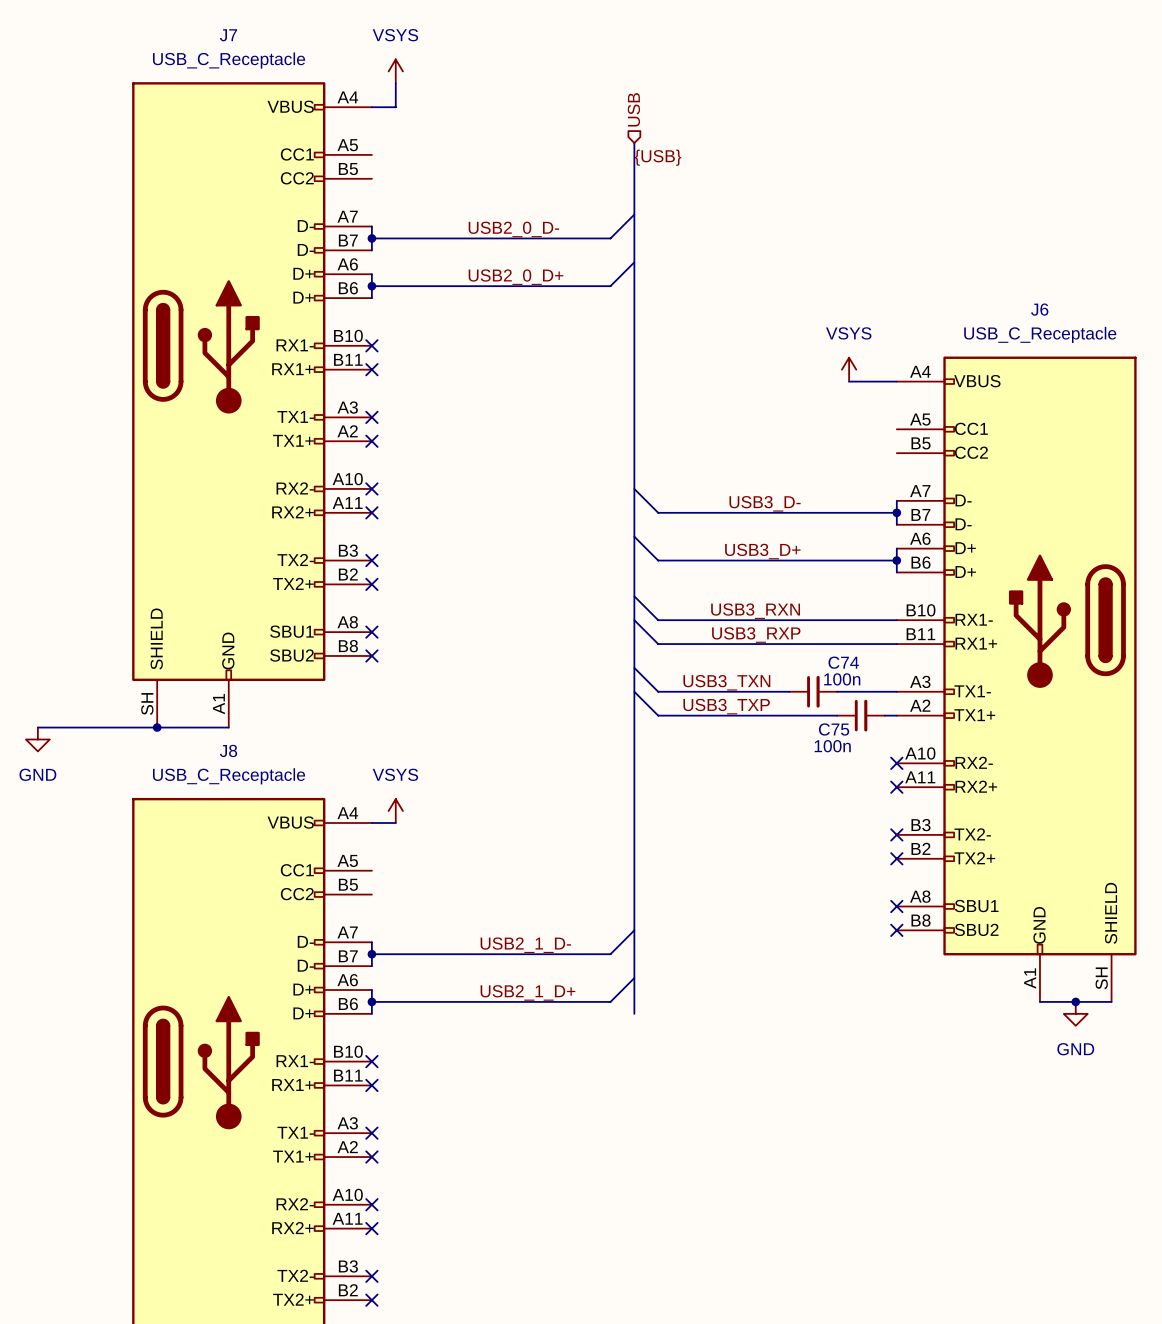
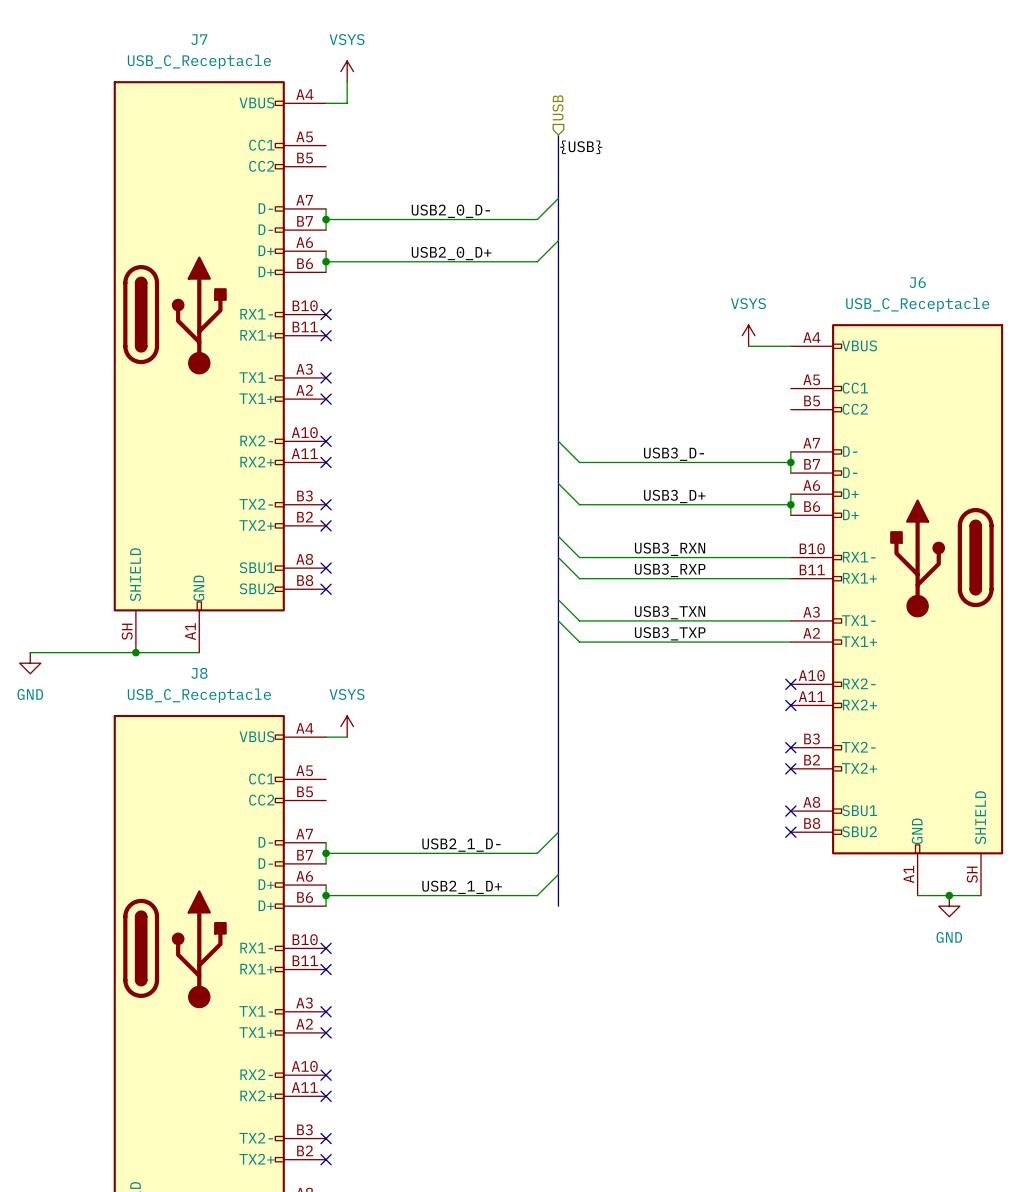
label position: USB3_TXN (726, 682) -> USB3_TXN (670, 612)
C74: 100n (813, 691) -> none
label position: USB3_TXP (726, 706) -> USB3_TXP (670, 633)
C75: 100n (861, 715) -> none

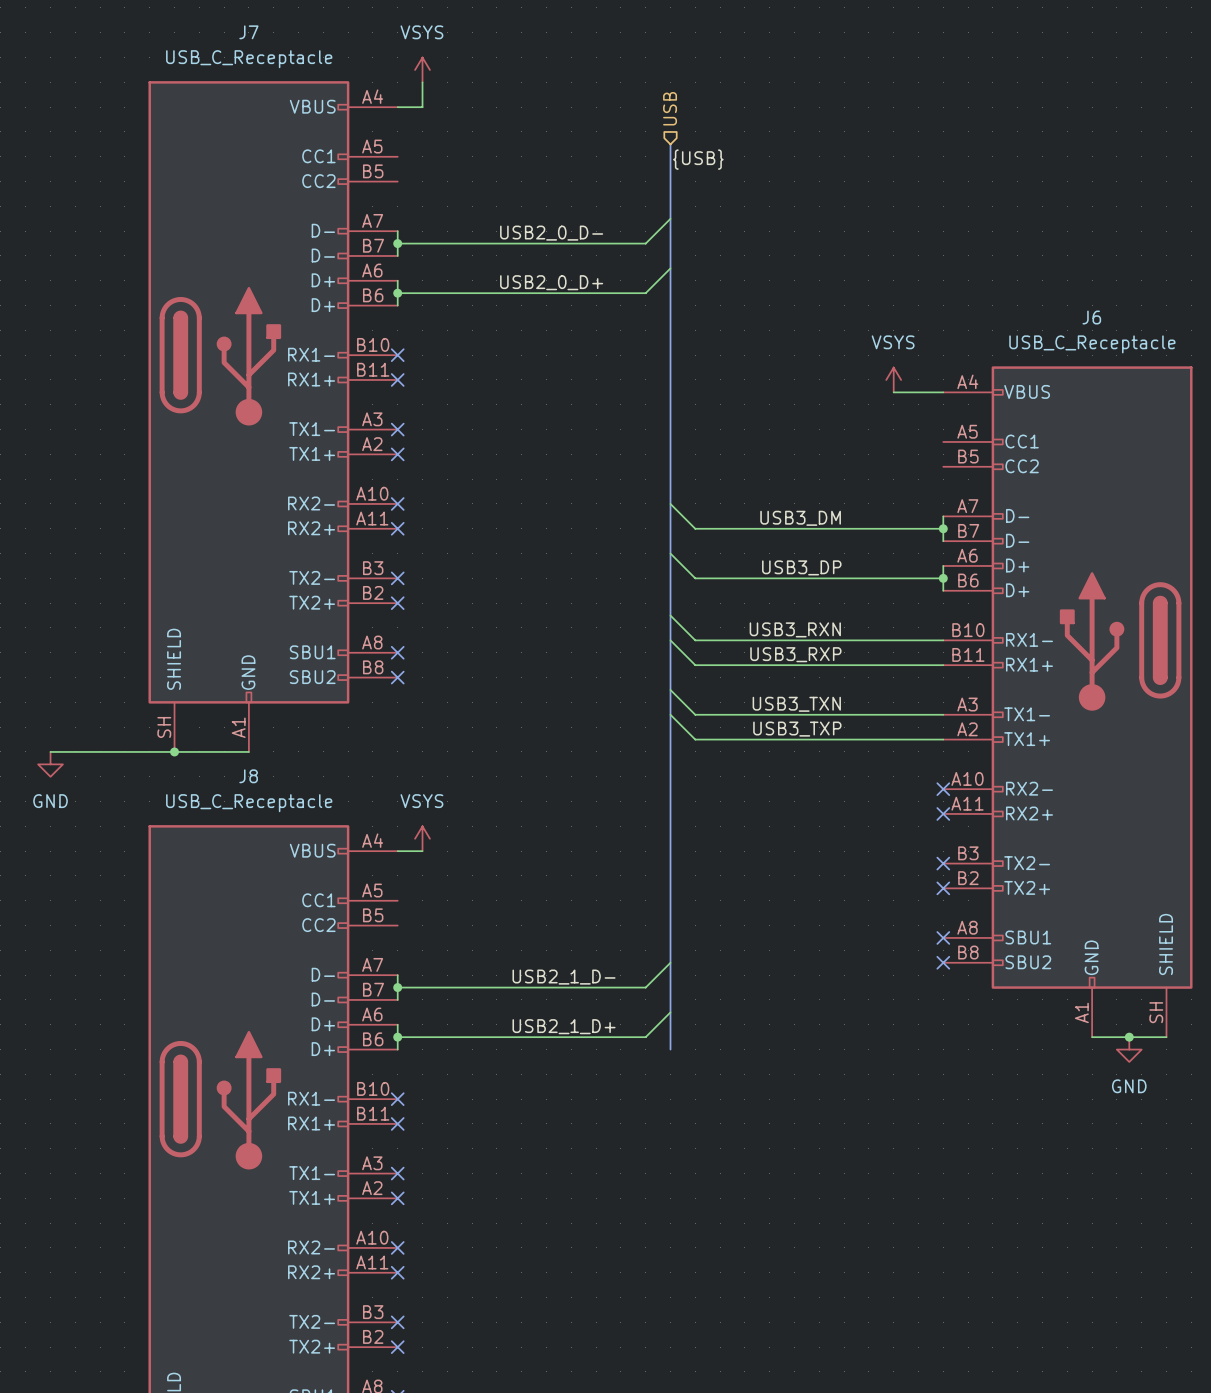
label: USB3_D- (673, 454) -> USB3_DM (800, 518)
label: USB3_D+ (674, 496) -> USB3_DP (801, 567)

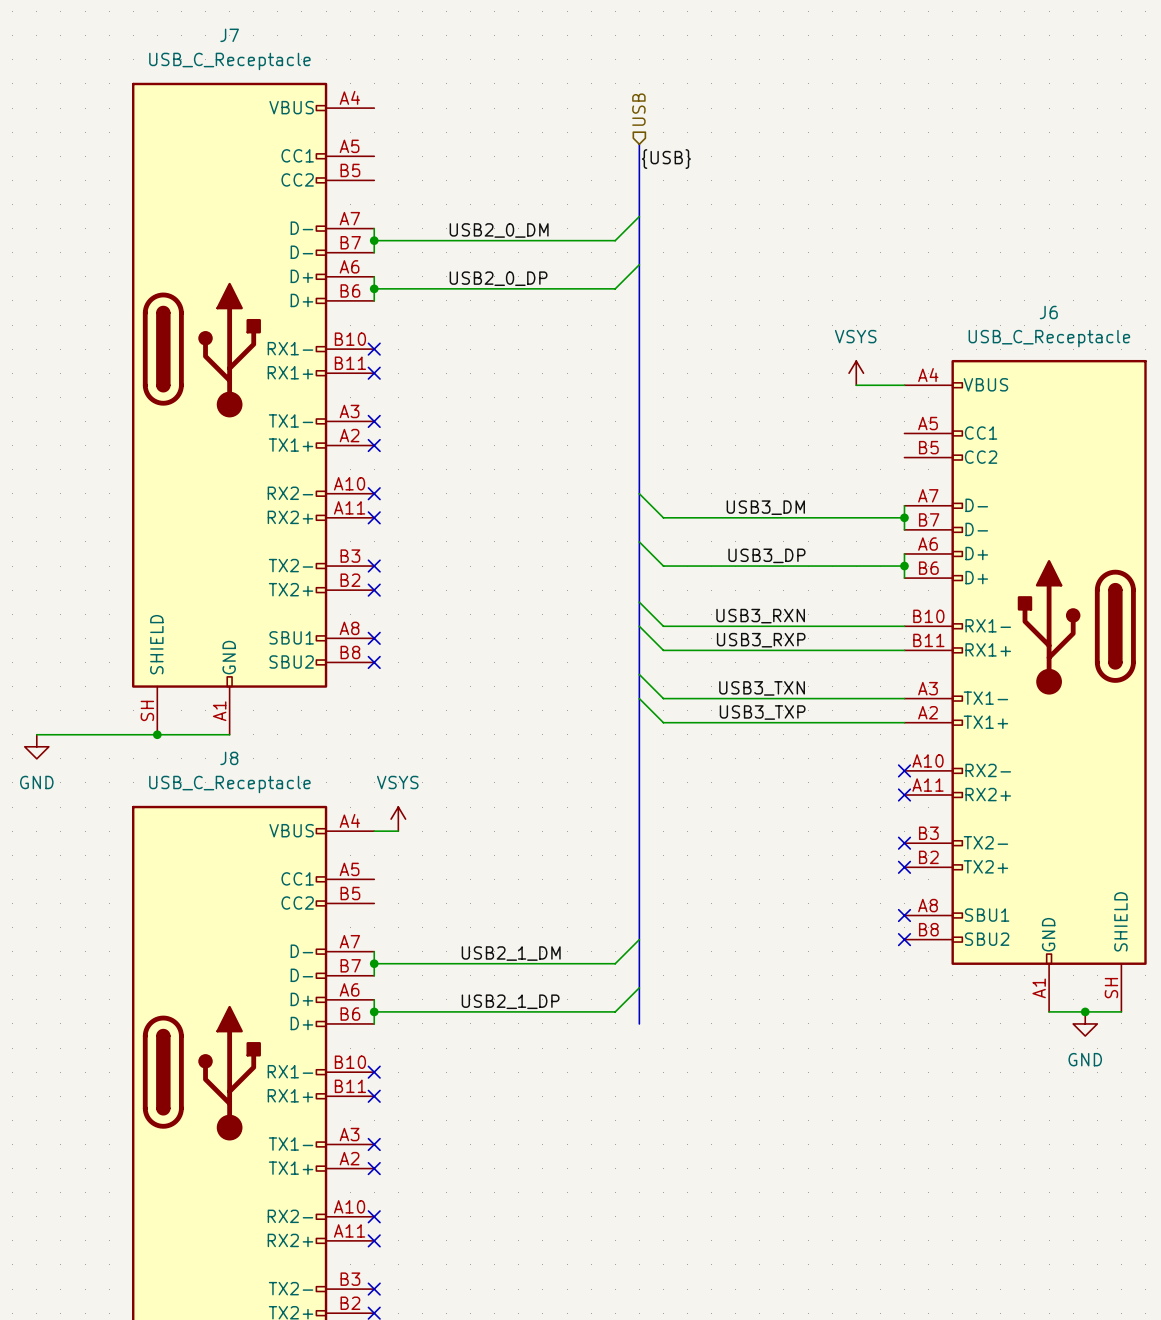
power symbol: VSYS (422, 69) -> none
wire: (422, 82) (422, 107) (397, 107) -> none
label: USB2_0_D- (551, 233) -> USB2_0_DM (499, 230)
label: USB2_0_D+ (551, 282) -> USB2_0_DP (498, 278)
label: USB2_1_D- (564, 977) -> USB2_1_DM (511, 953)
label: USB2_1_D+ (564, 1026) -> USB2_1_DP (510, 1001)

